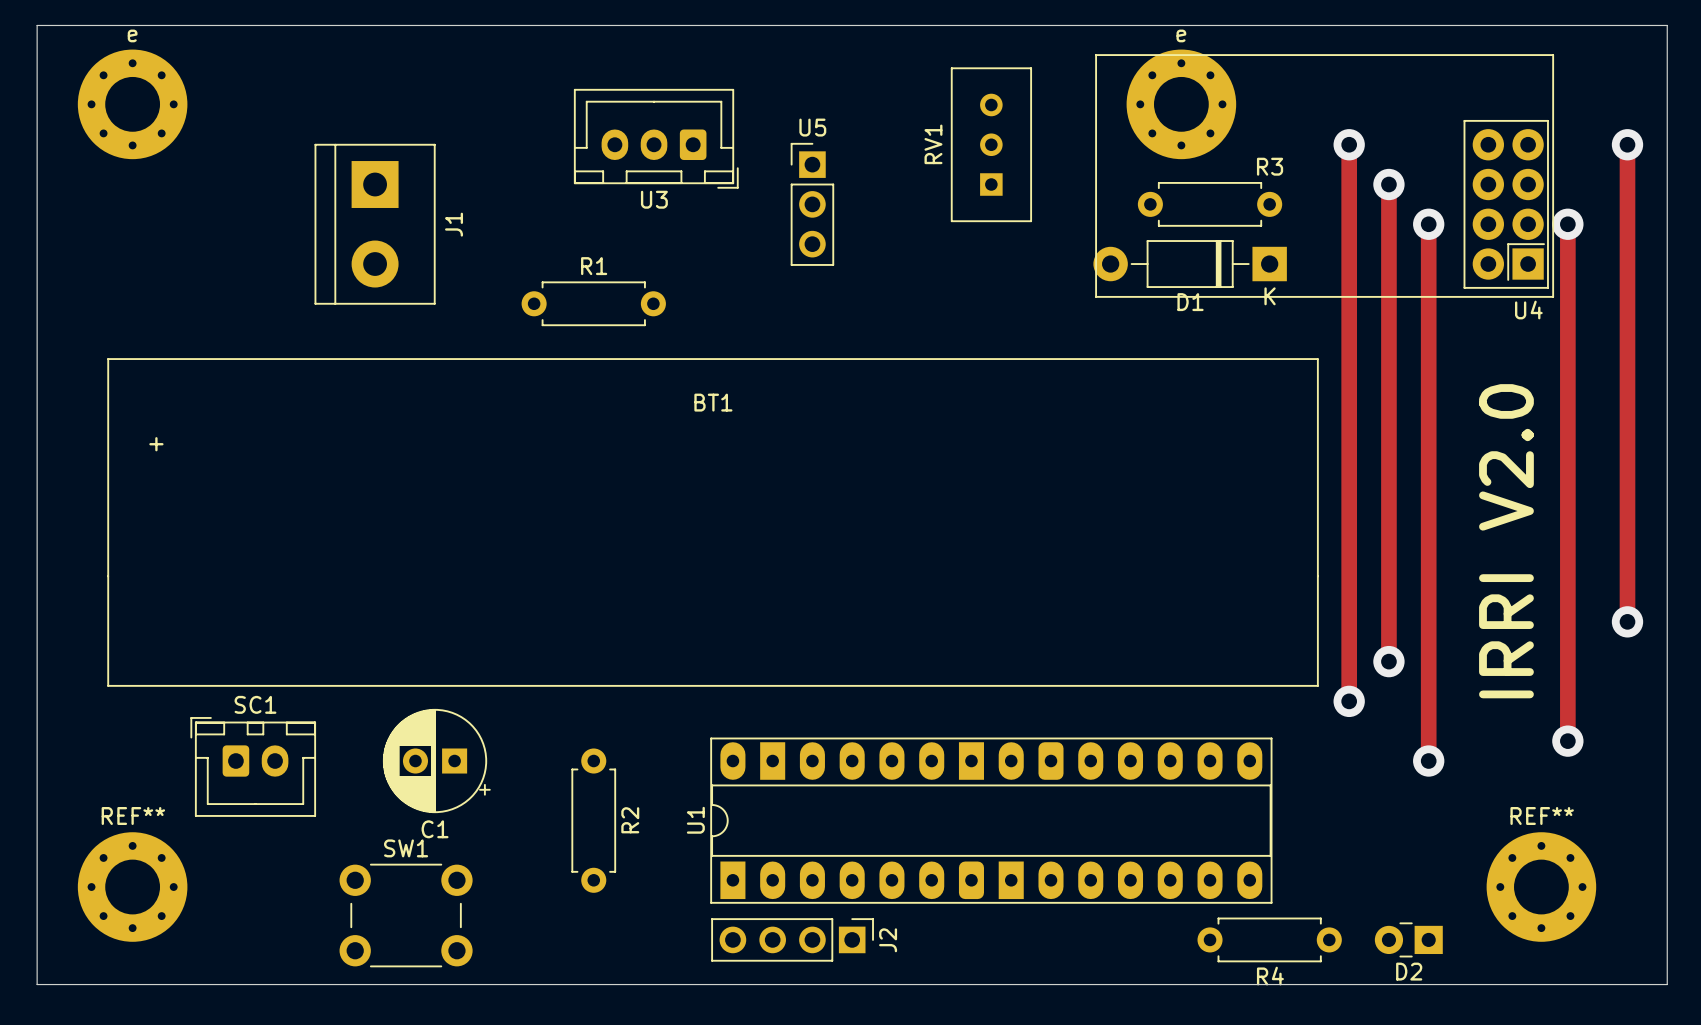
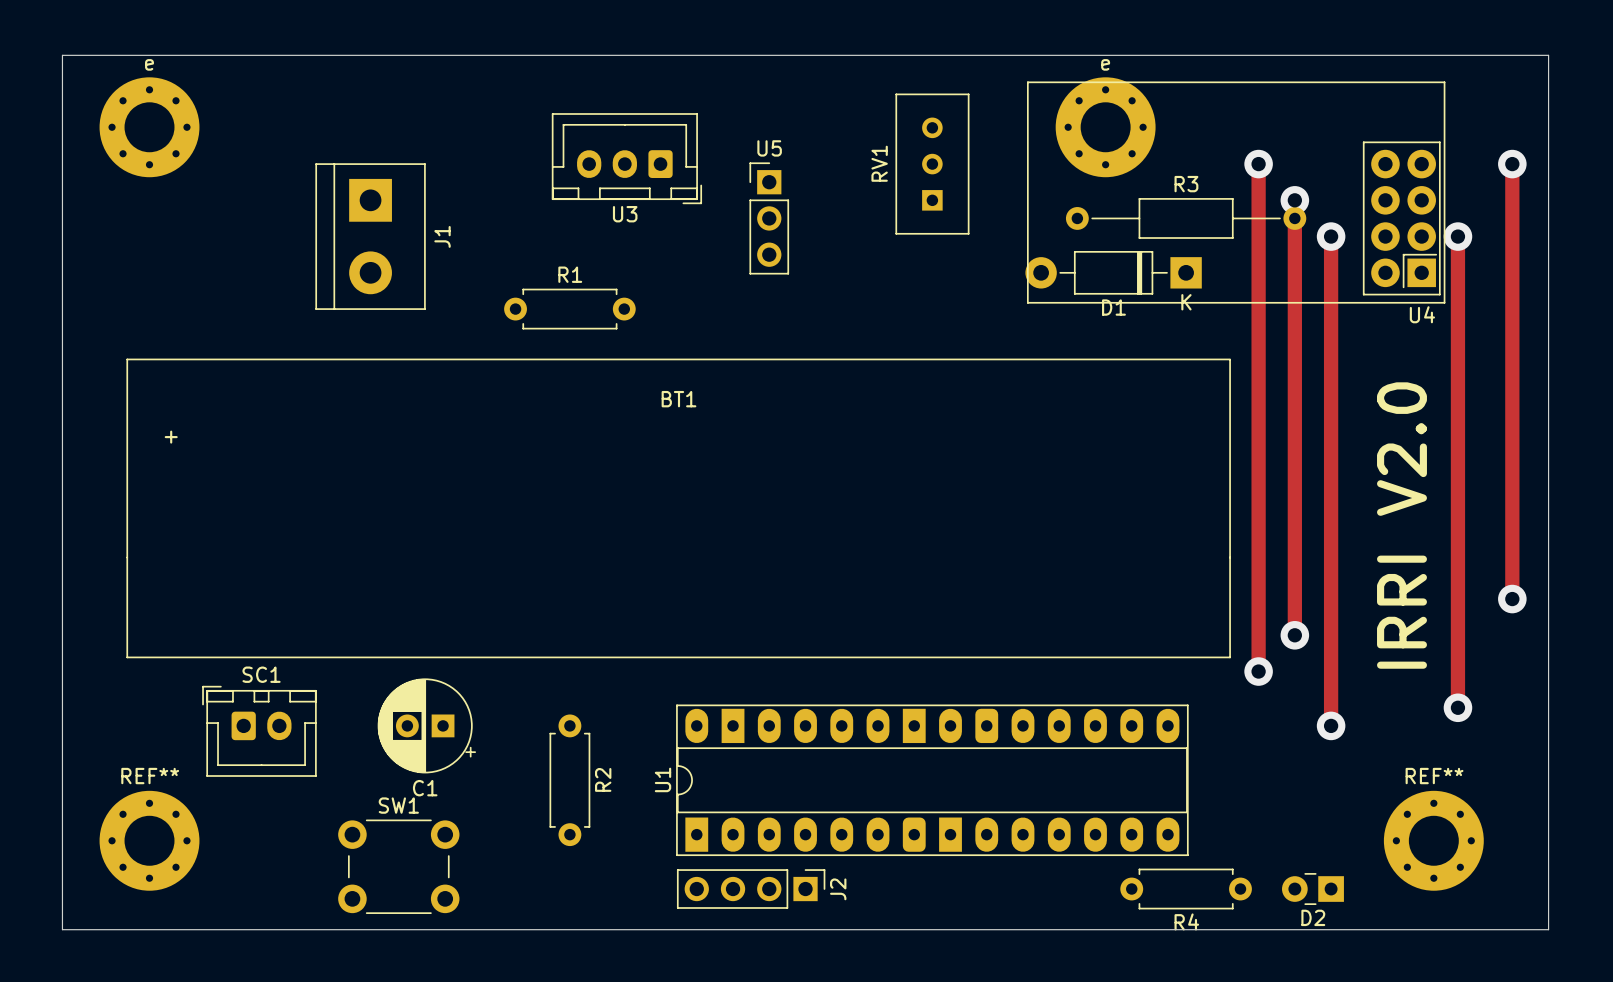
R3 footprint: [1137, 182, 1283, 227] -> [1065, 198, 1307, 239]

